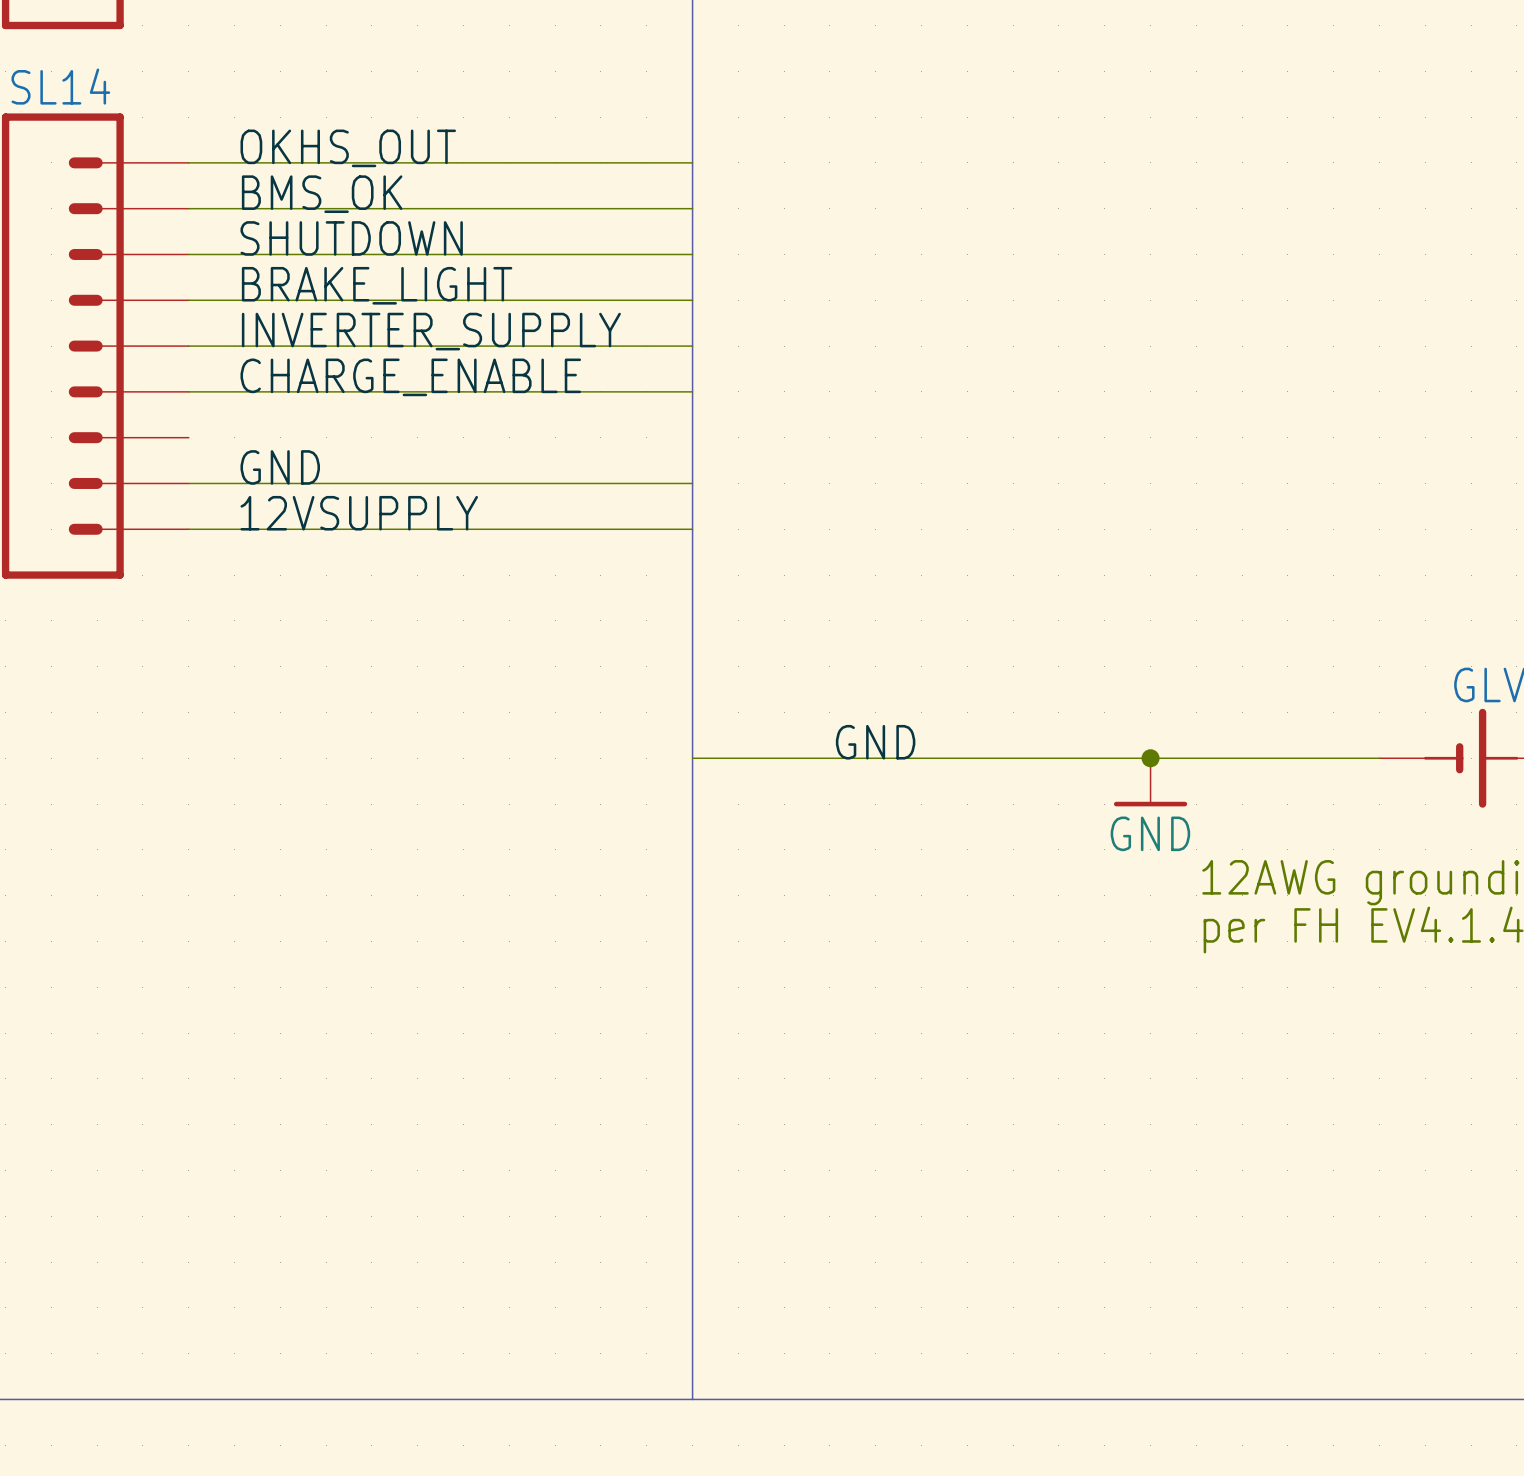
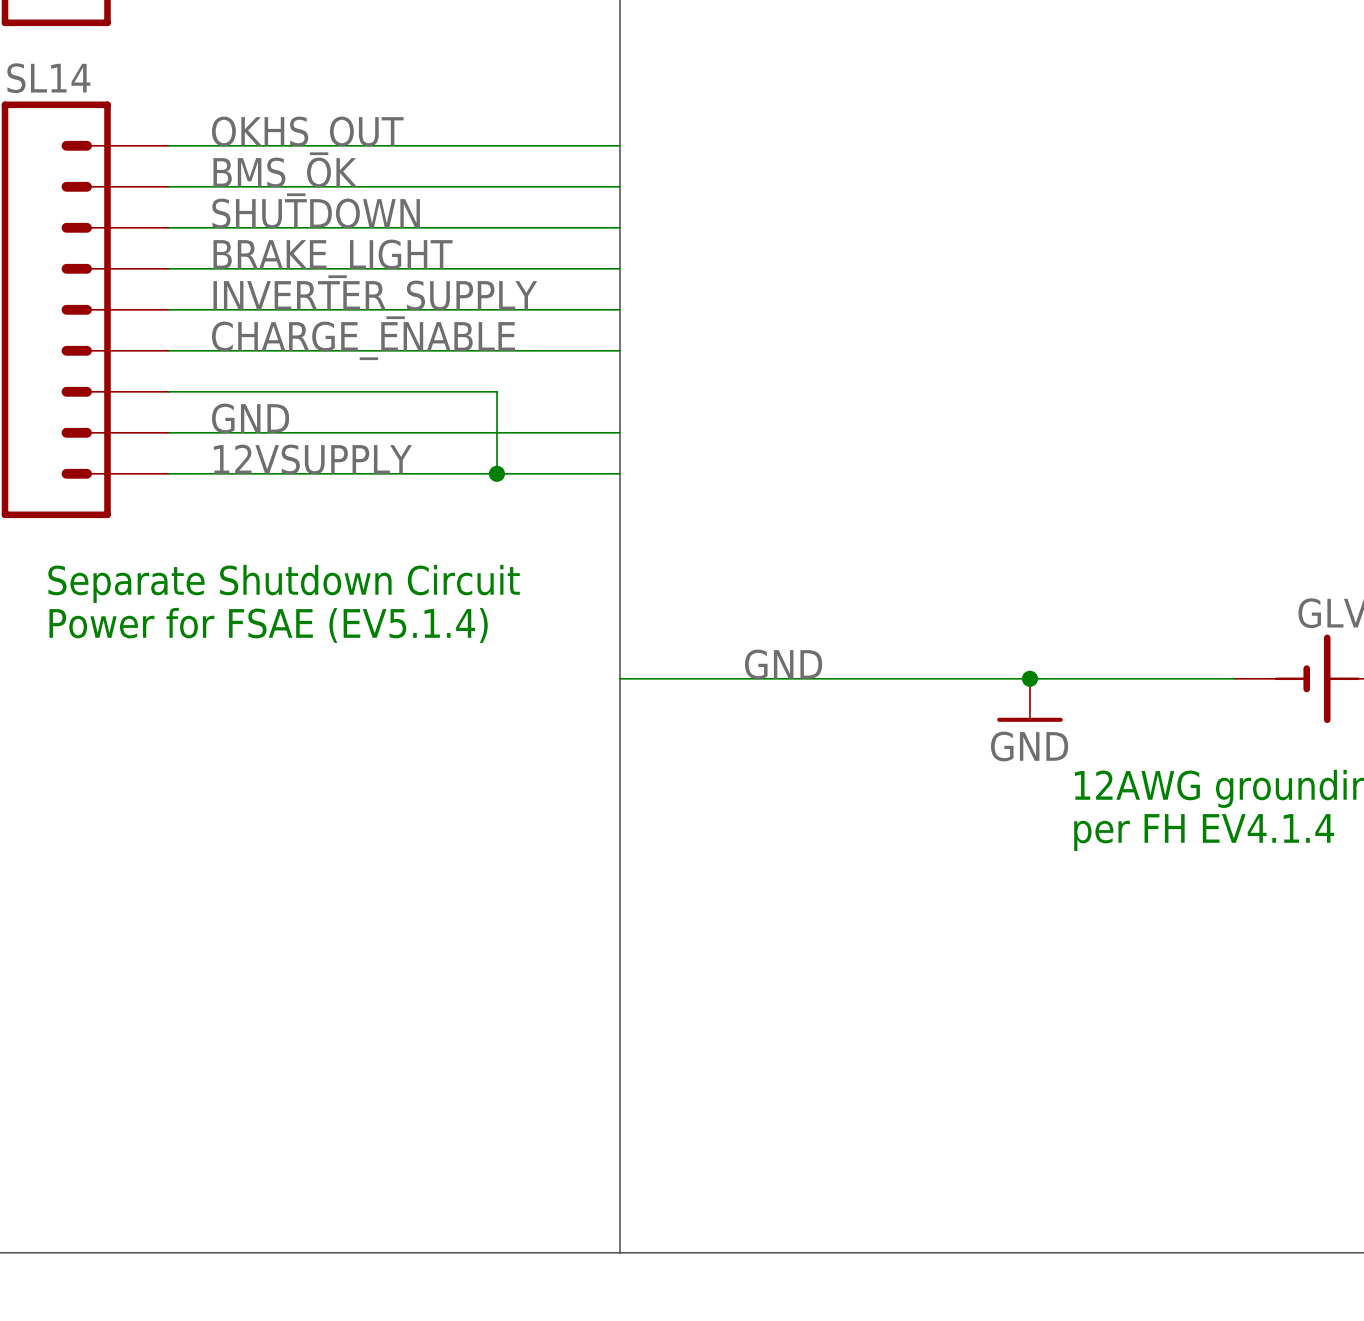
wire: none -> (168, 391) (496, 391) (496, 473)
junction: none -> (496, 473)
text: none -> Separate Shutdown Circuit (284, 583)
text: none -> Power for FSAE (EV5.1.4) (268, 625)

